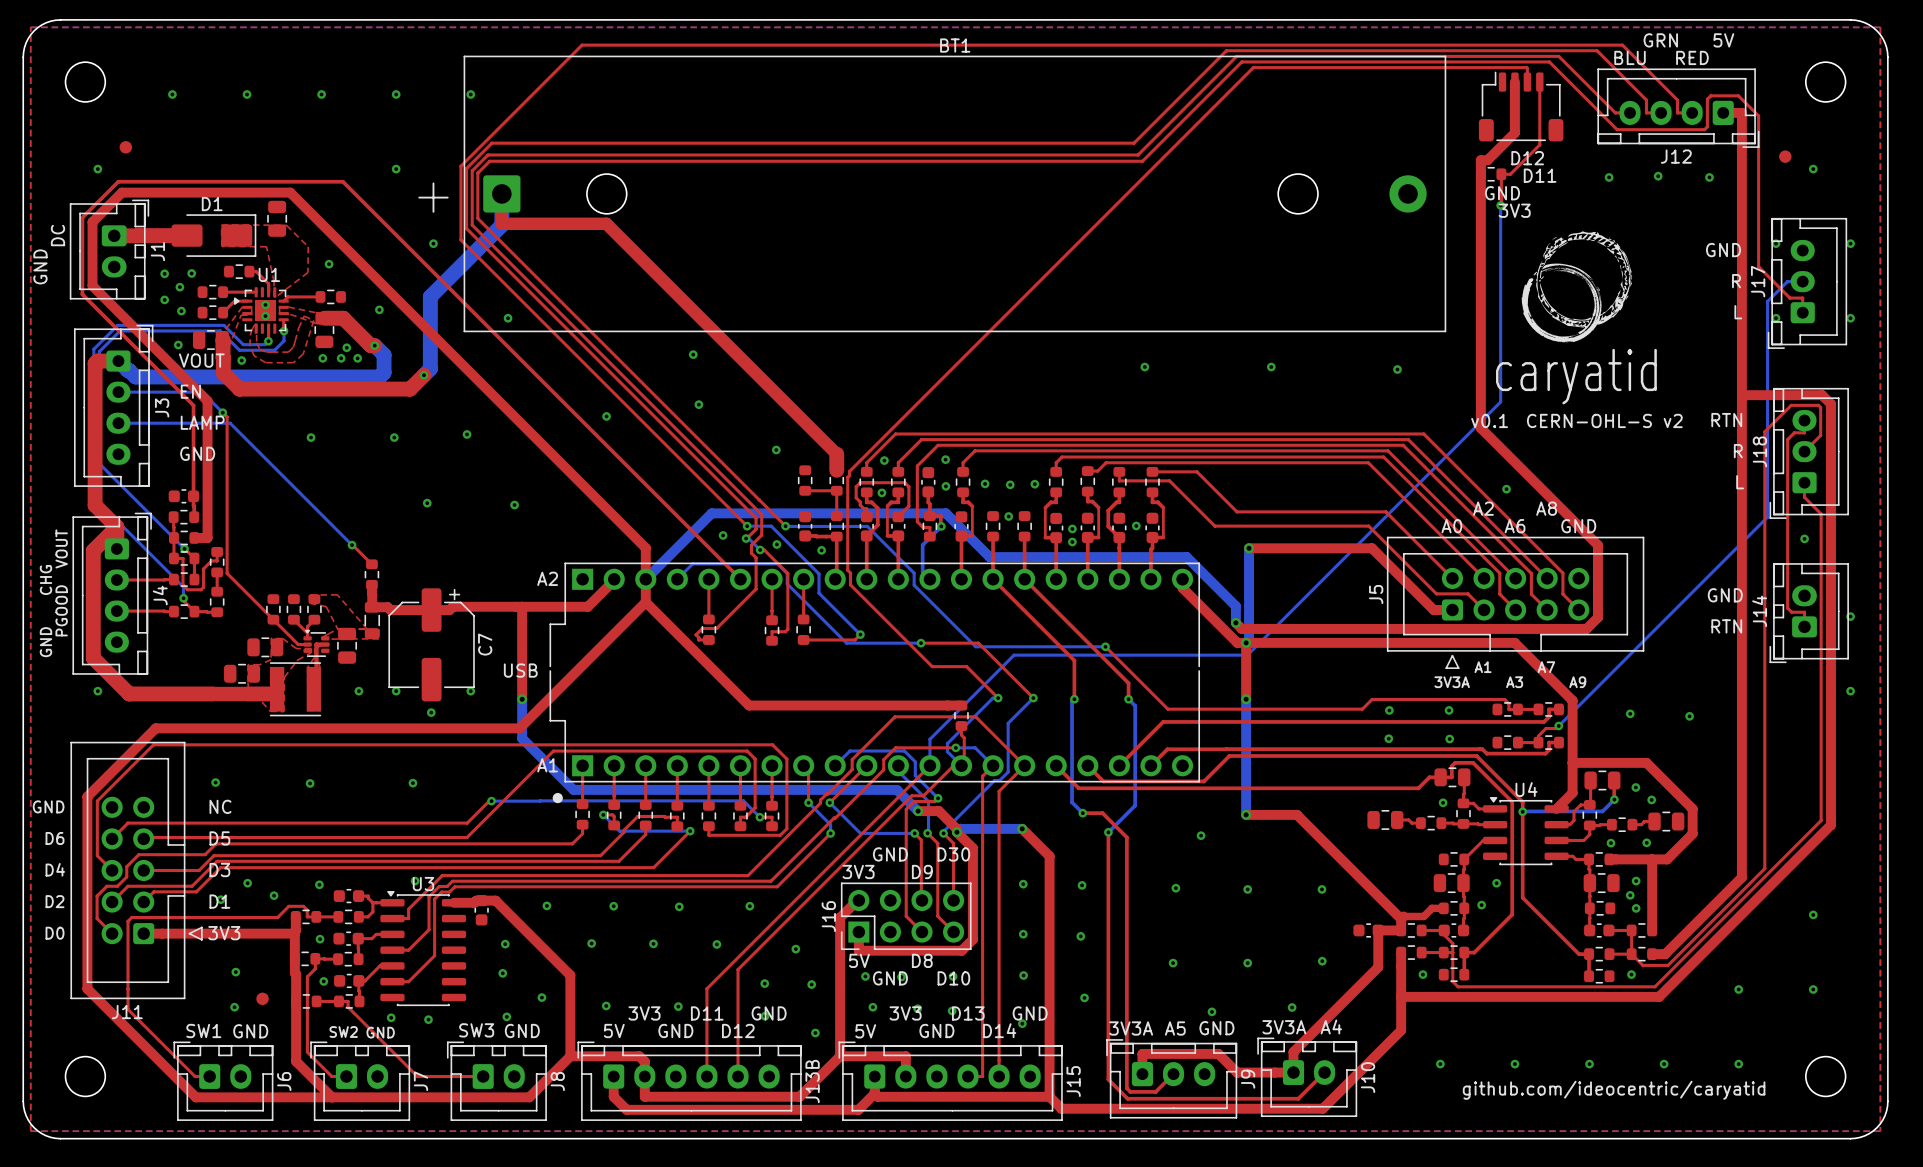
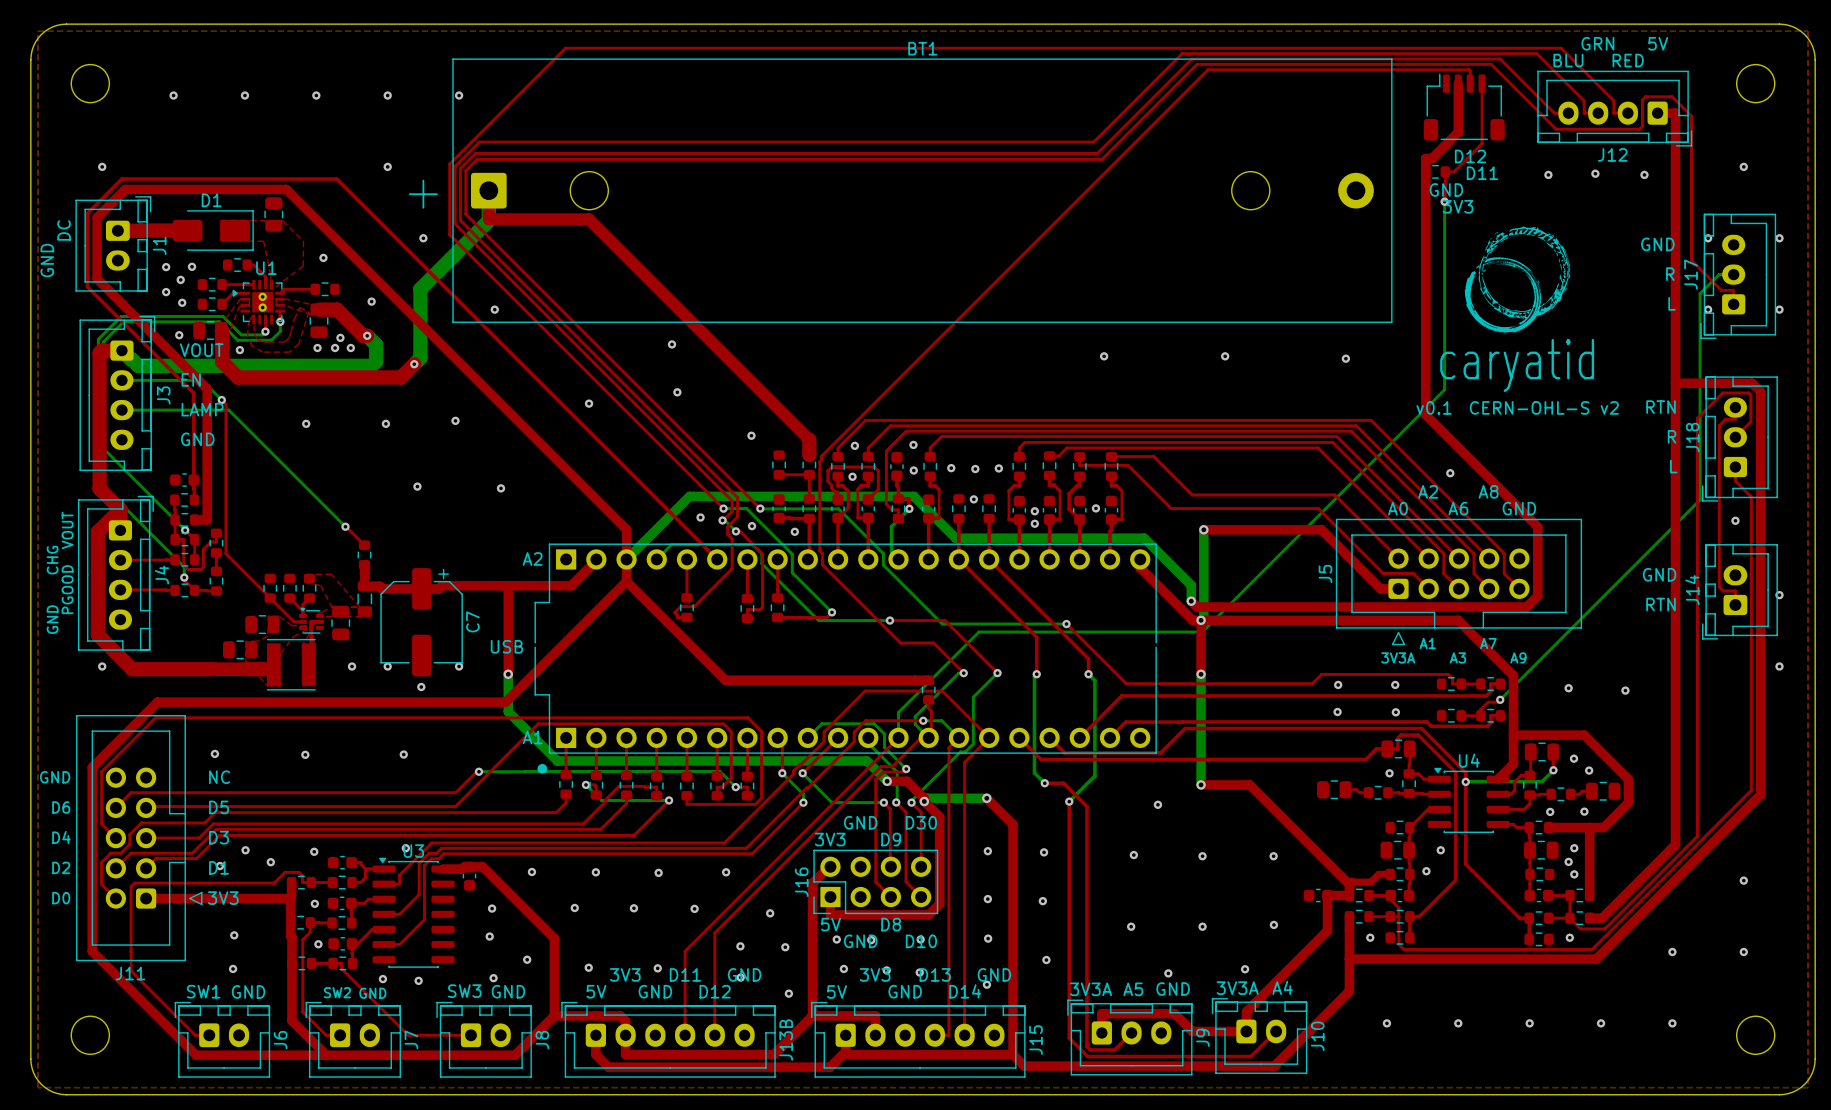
part: (125, 147) -> none
part: (1785, 156) -> none
part: (262, 998) -> none
text: github.com/ideocentric/caryatid (1614, 1090) -> none

